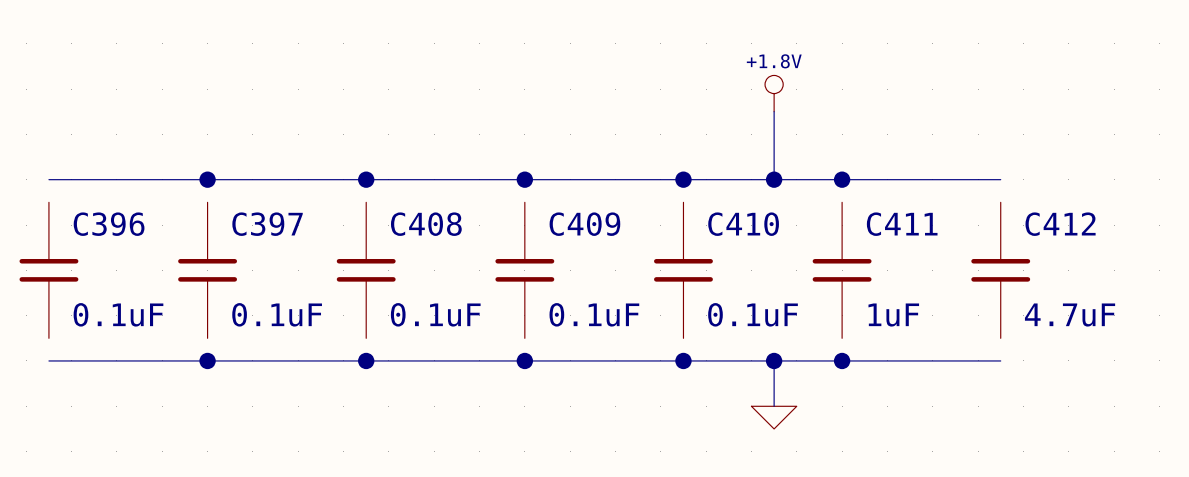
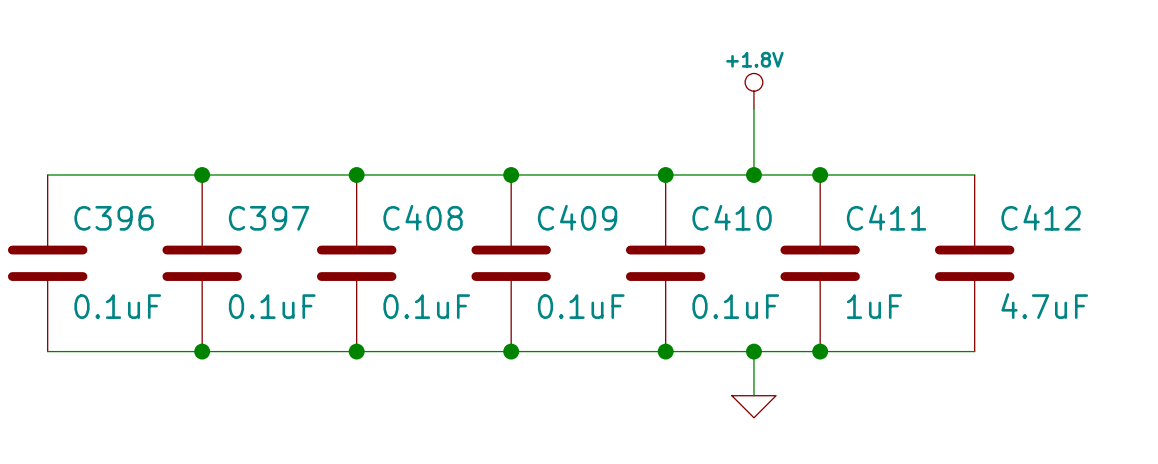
C396 symbol: [19, 202, 79, 339] -> [7, 175, 88, 352]
C397 symbol: [178, 202, 238, 339] -> [162, 175, 242, 352]
C408 symbol: [336, 202, 396, 339] -> [316, 175, 397, 352]
C409 symbol: [495, 202, 555, 339] -> [471, 175, 551, 352]
C410 symbol: [654, 202, 713, 339] -> [625, 175, 706, 352]
C411 symbol: [812, 202, 872, 339] -> [780, 175, 860, 352]
C412 symbol: [971, 202, 1031, 339] -> [934, 175, 1015, 352]

